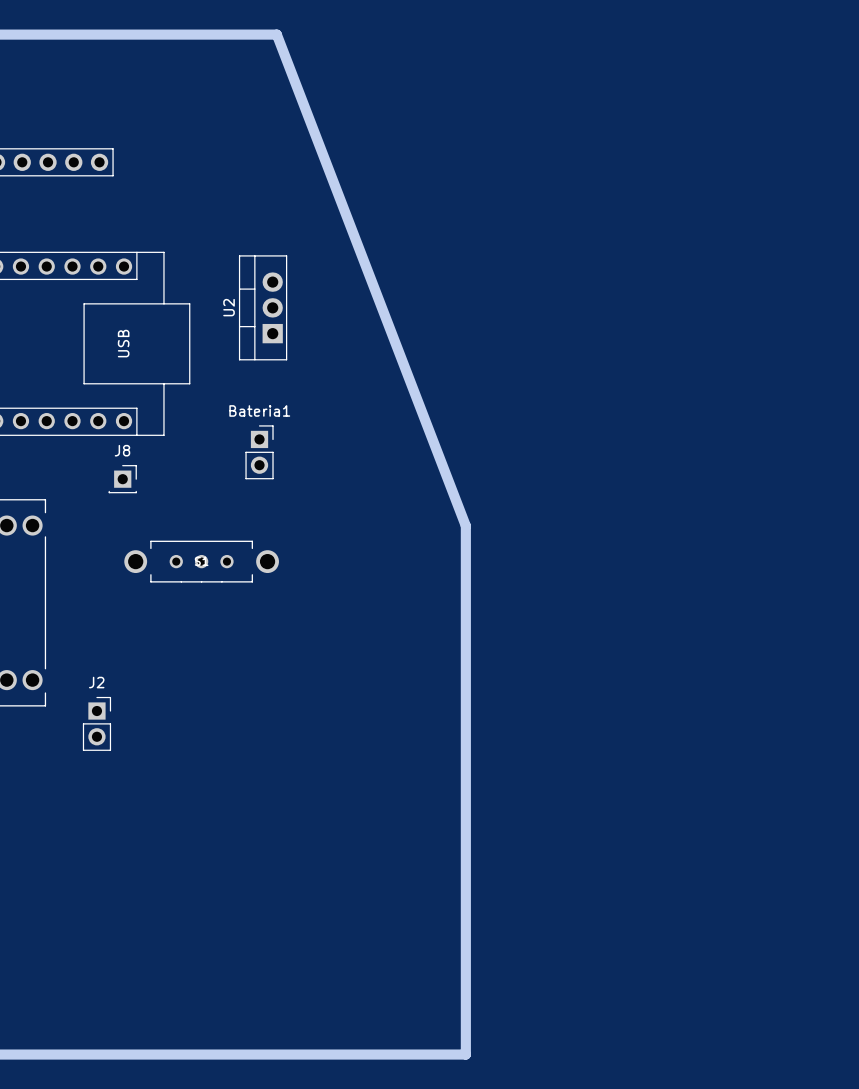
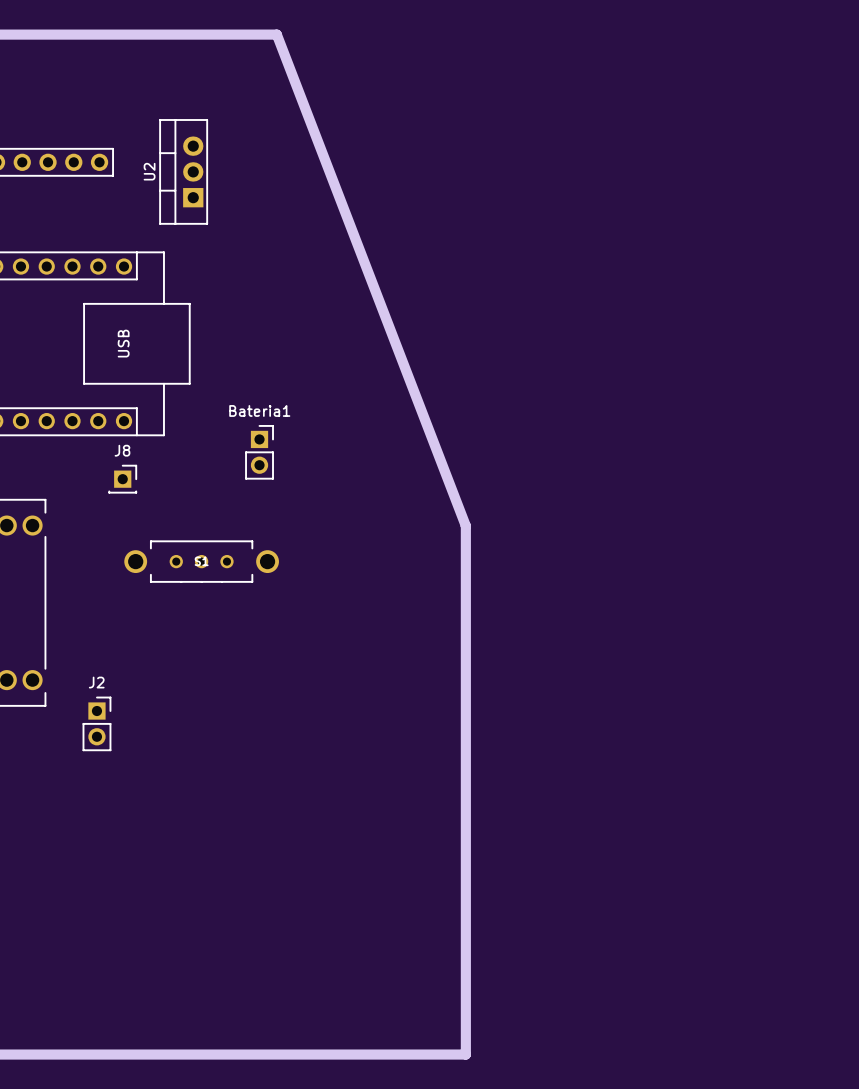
U2 position: (263, 307) -> (183, 171)

